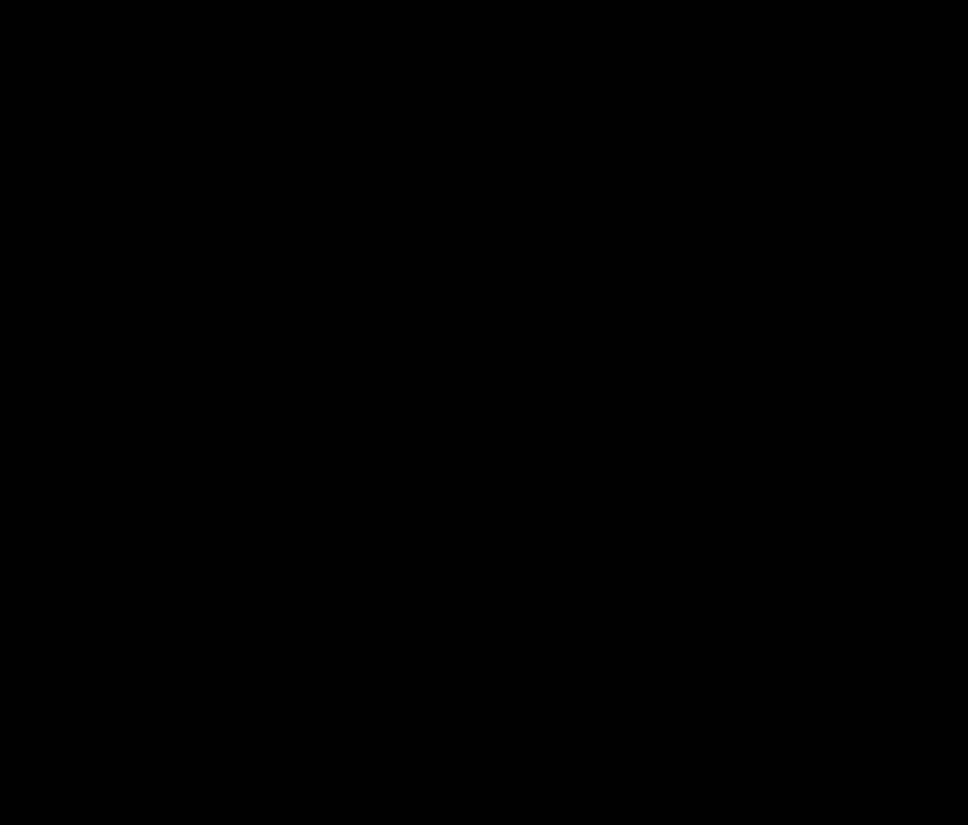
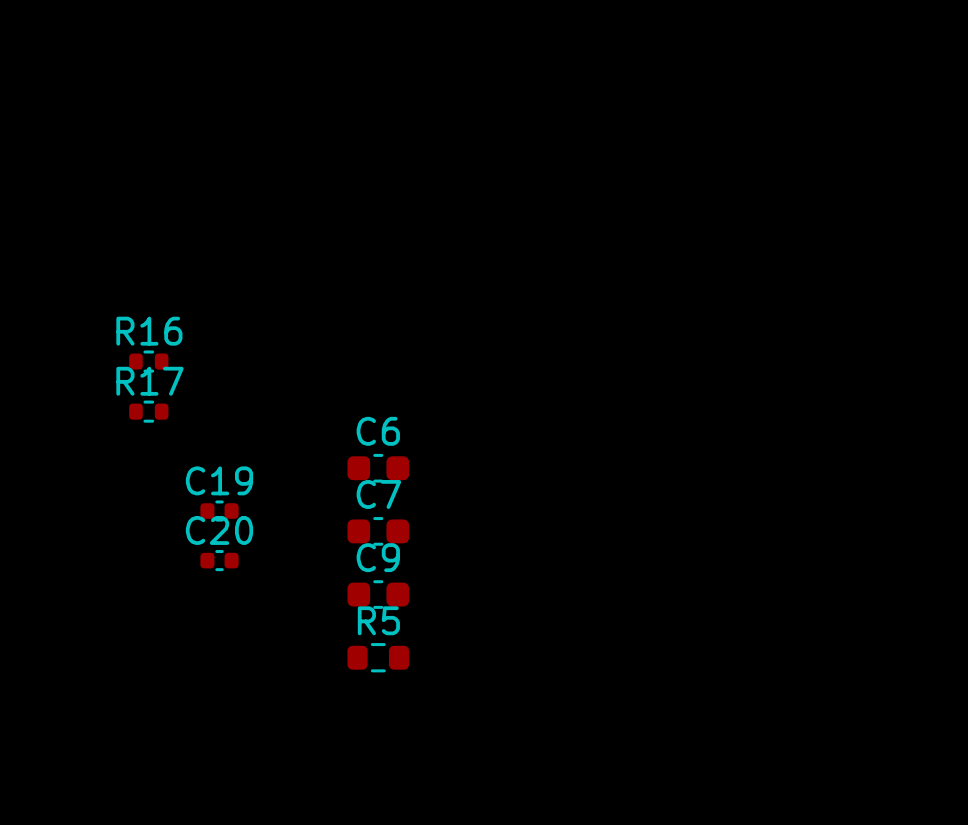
R16: none -> (148, 361)
R17: none -> (148, 411)
C6: none -> (378, 468)
C19: none -> (219, 511)
C7: none -> (378, 531)
C20: none -> (219, 560)
C9: none -> (378, 594)
R5: none -> (378, 657)

